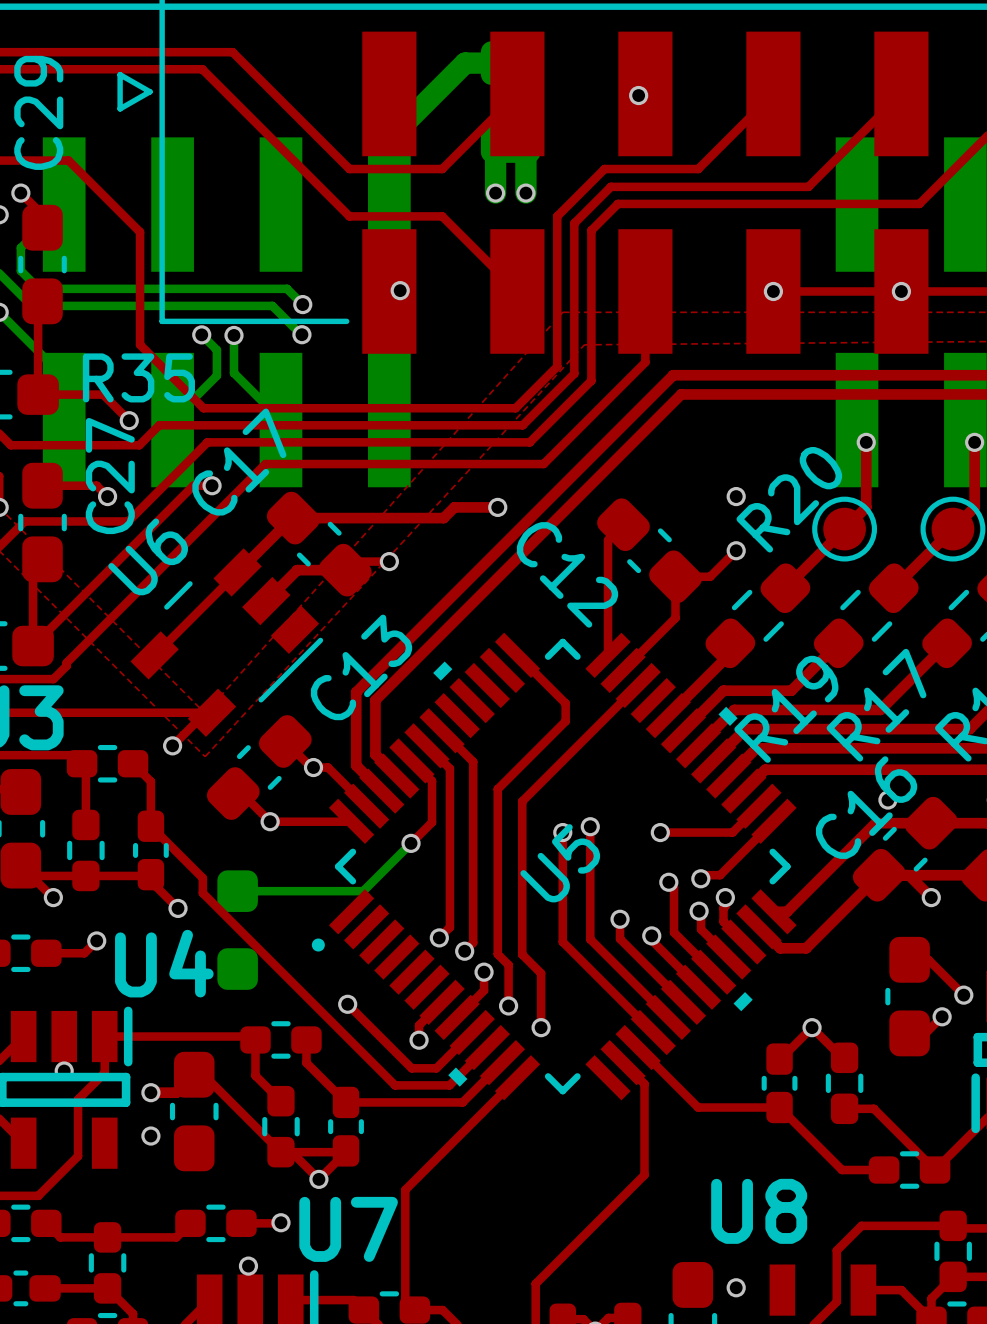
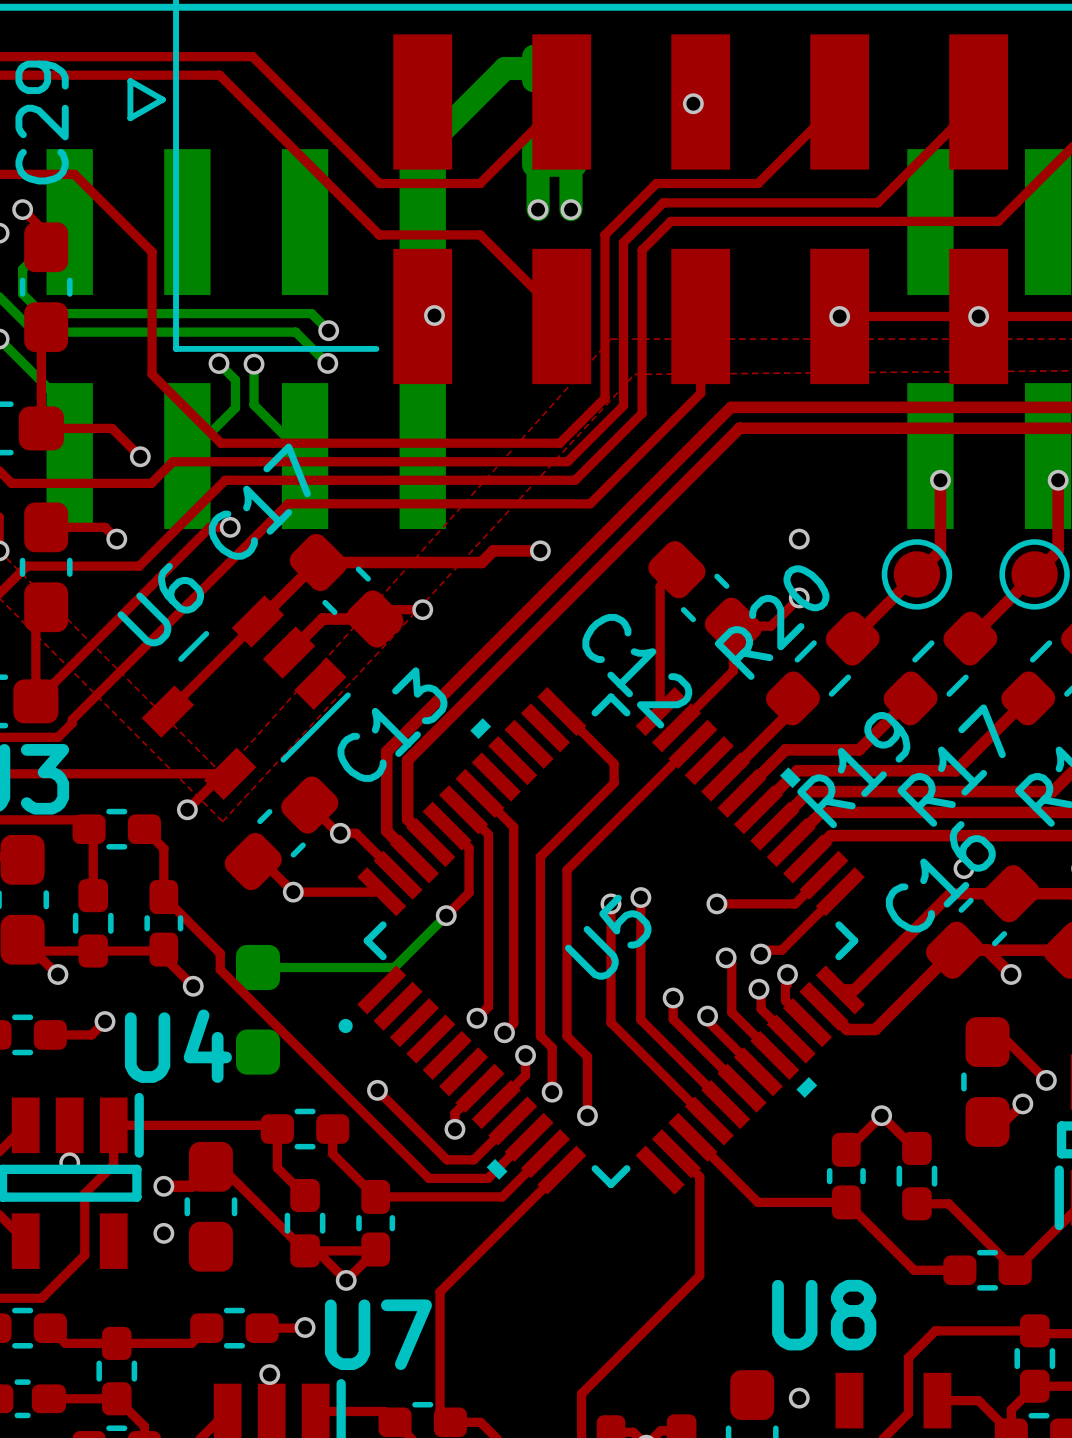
R35 name: R35 (138, 377) -> none
C27 name: C27 (110, 476) -> none
R20 name position: R20 (789, 499) -> R20 (772, 622)
C12 name position: C12 (567, 574) -> C12 (637, 671)

